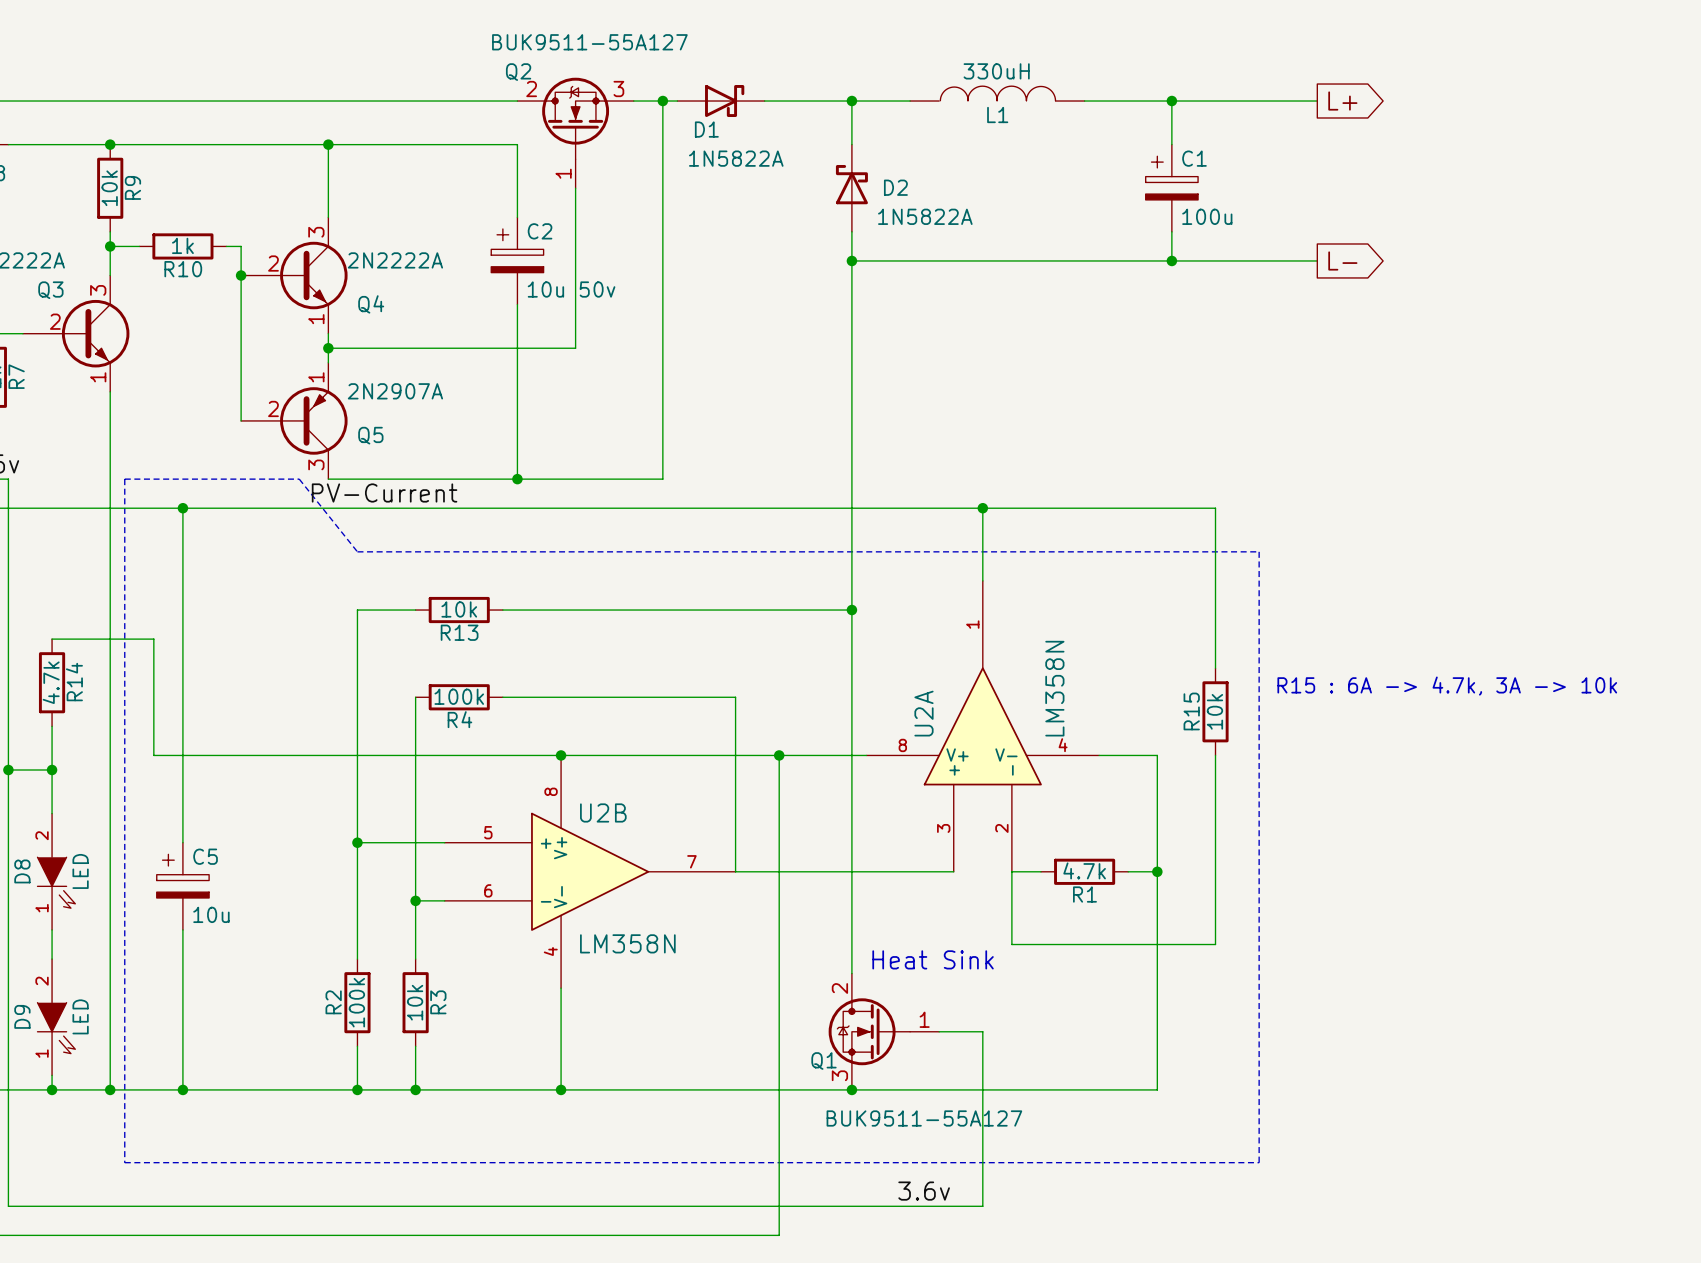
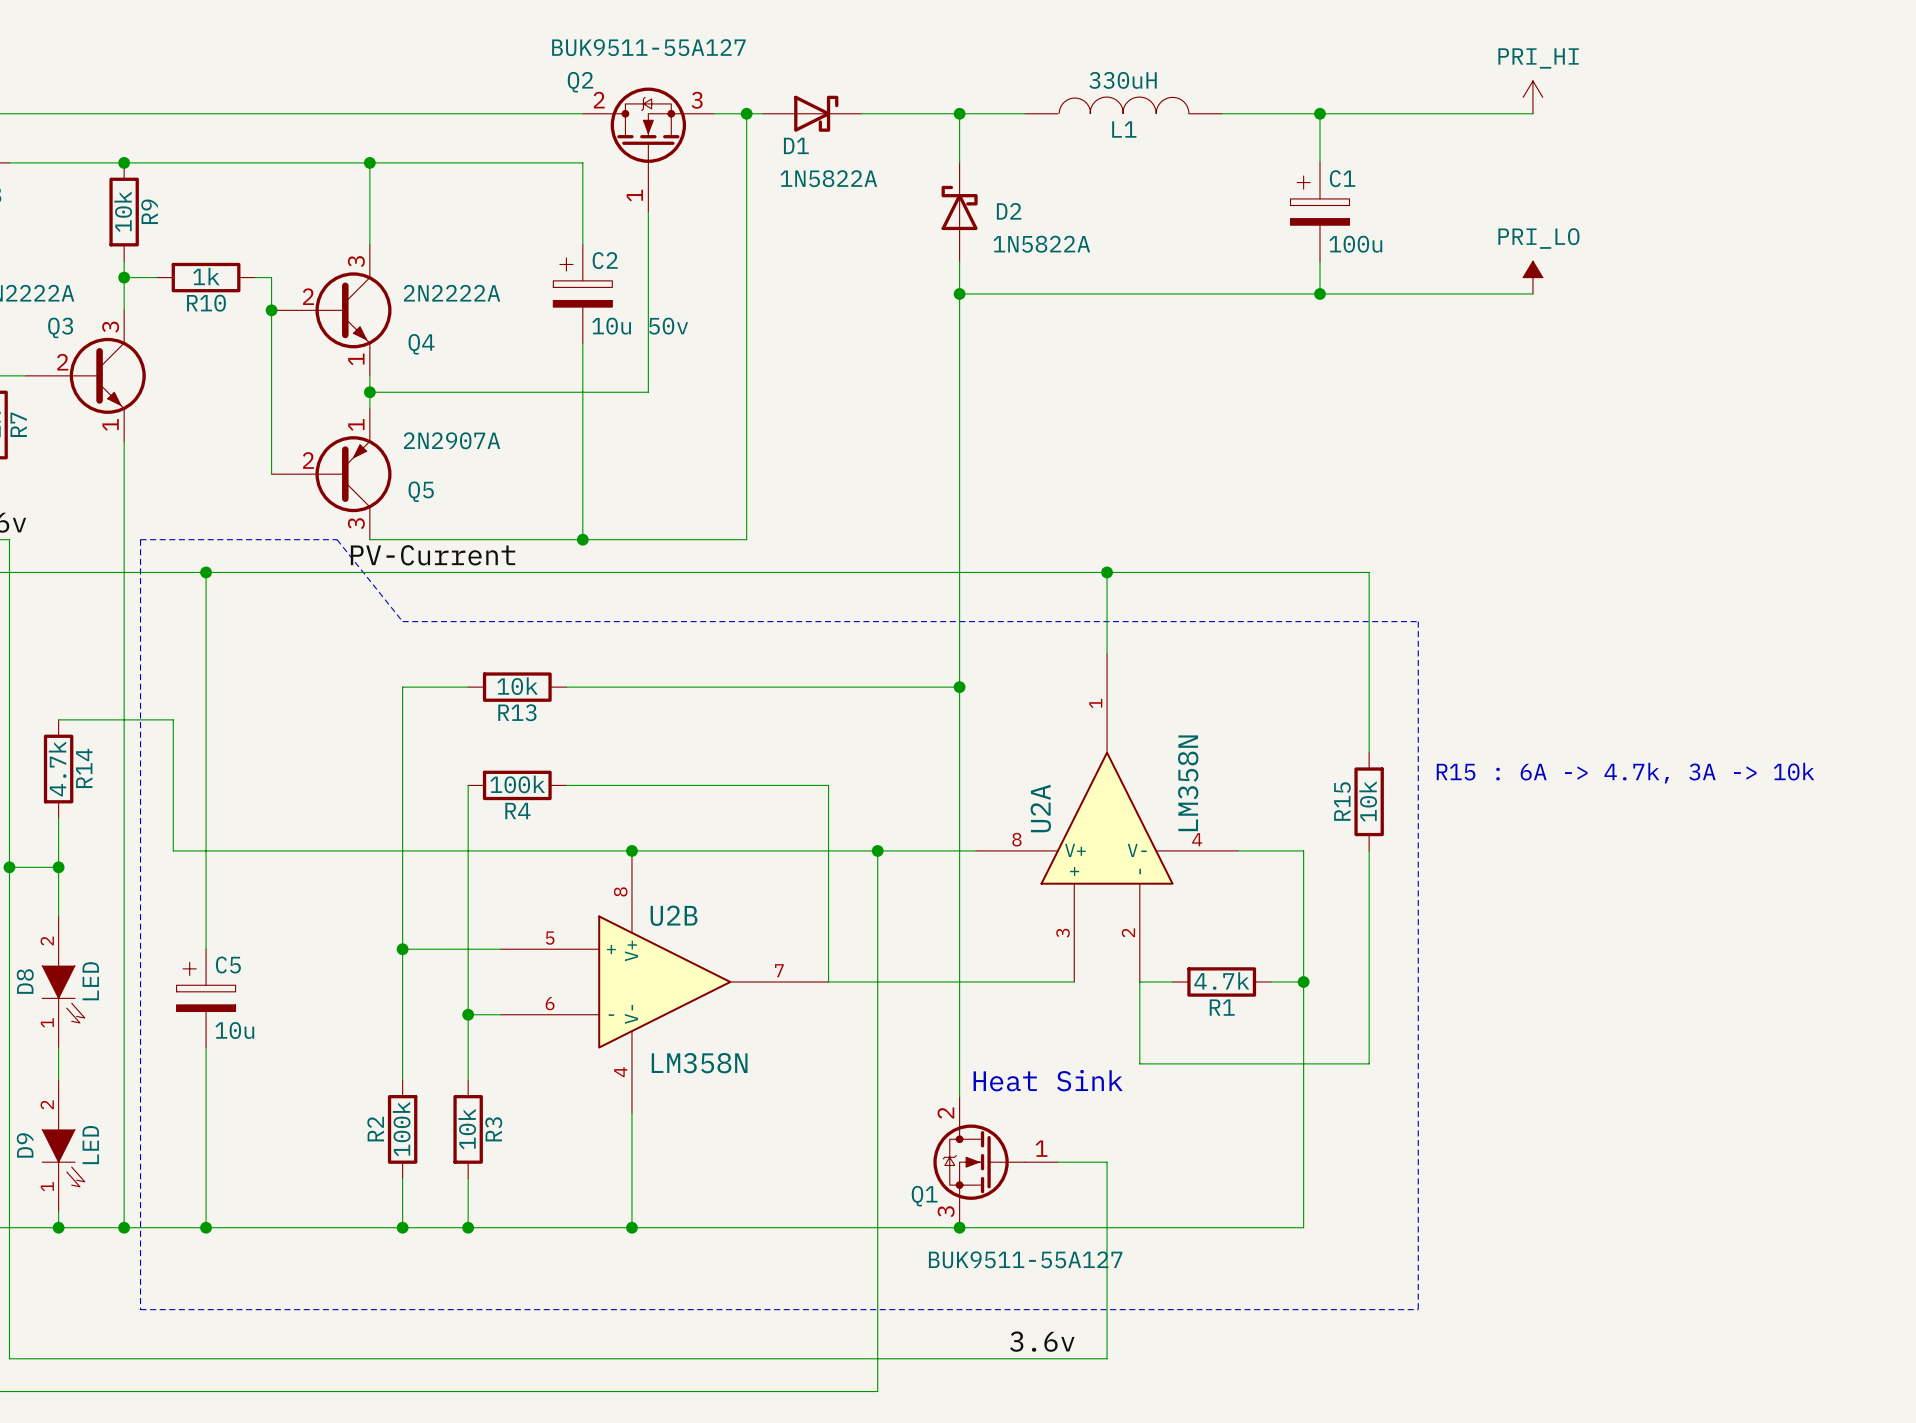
power symbol: none -> PRI_HI (1532, 97)
wire: none -> (1483, 113) (1532, 113)
global label: L+ (1342, 101) -> none
power symbol: none -> PRI_LO (1532, 277)
wire: none -> (1483, 293) (1532, 293)
global label: L- (1342, 260) -> none

